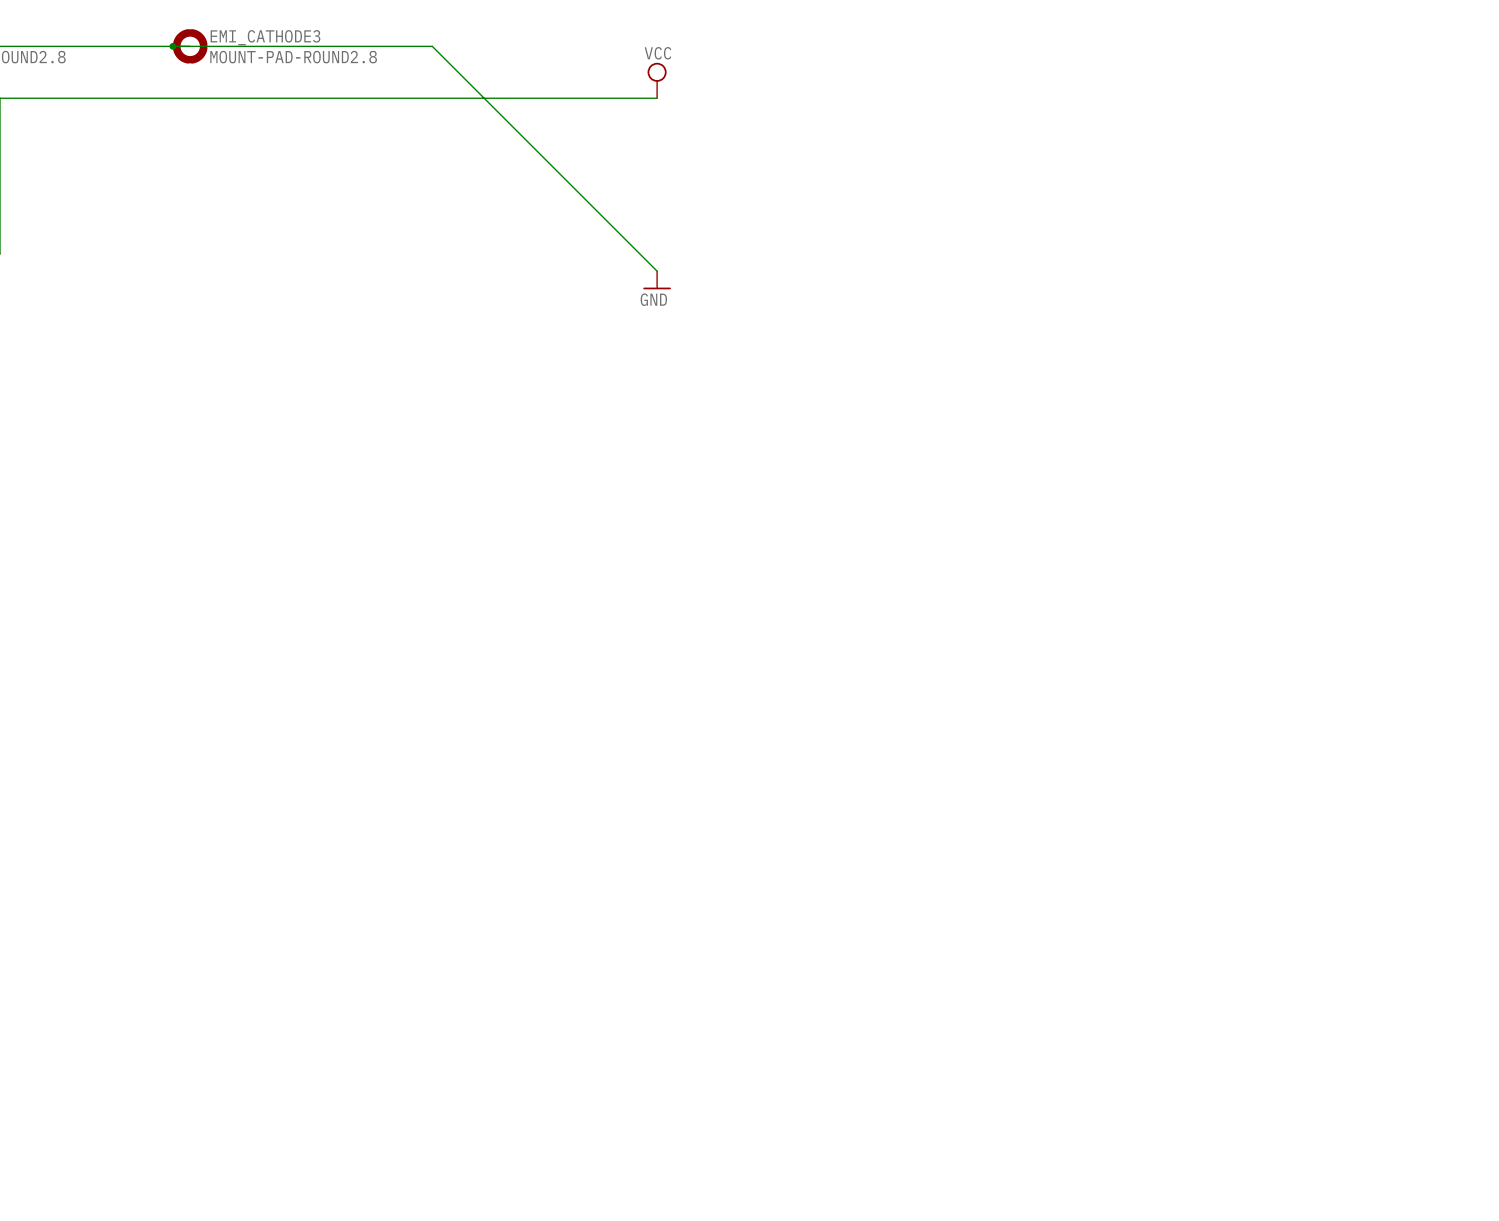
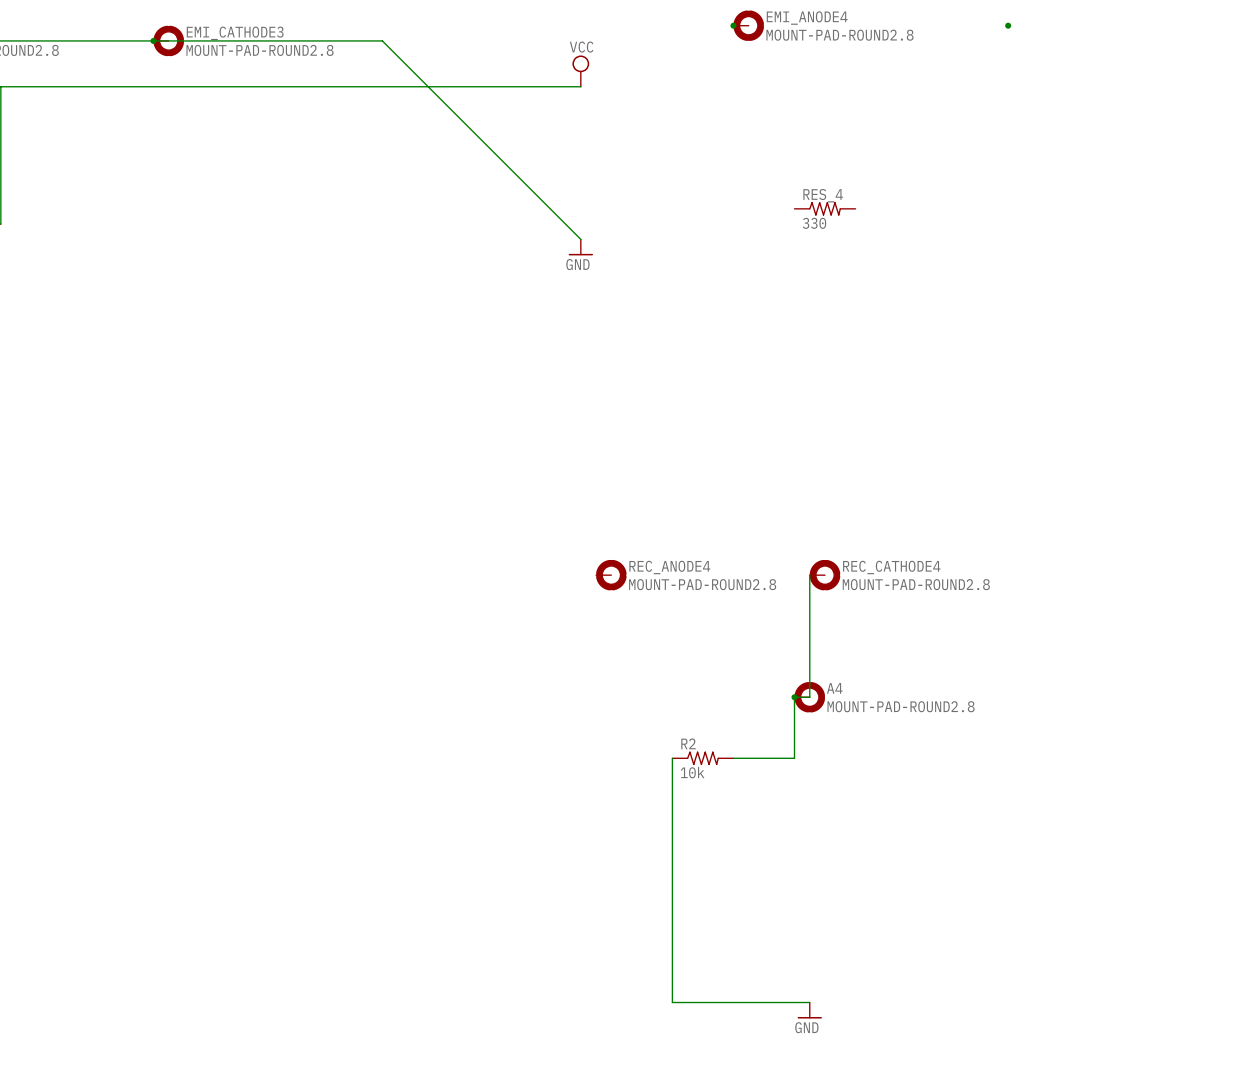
junction: none -> (733, 25)
EMI_ANODE4: none -> MOUNT-PAD-ROUND2.8 (748, 25)
junction: none -> (1008, 25)
RES_4: none -> 330 (825, 208)
REC_ANODE4: none -> MOUNT-PAD-ROUND2.8 (611, 575)
wire: none -> (809, 575) (809, 697) (794, 697) (794, 758) (733, 758)
REC_CATHODE4: none -> MOUNT-PAD-ROUND2.8 (825, 575)
junction: none -> (794, 697)
A4: none -> MOUNT-PAD-ROUND2.8 (809, 697)
wire: none -> (672, 758) (672, 1002) (809, 1002)
R2: none -> 10k (702, 758)
power symbol: none -> GND (809, 1010)

